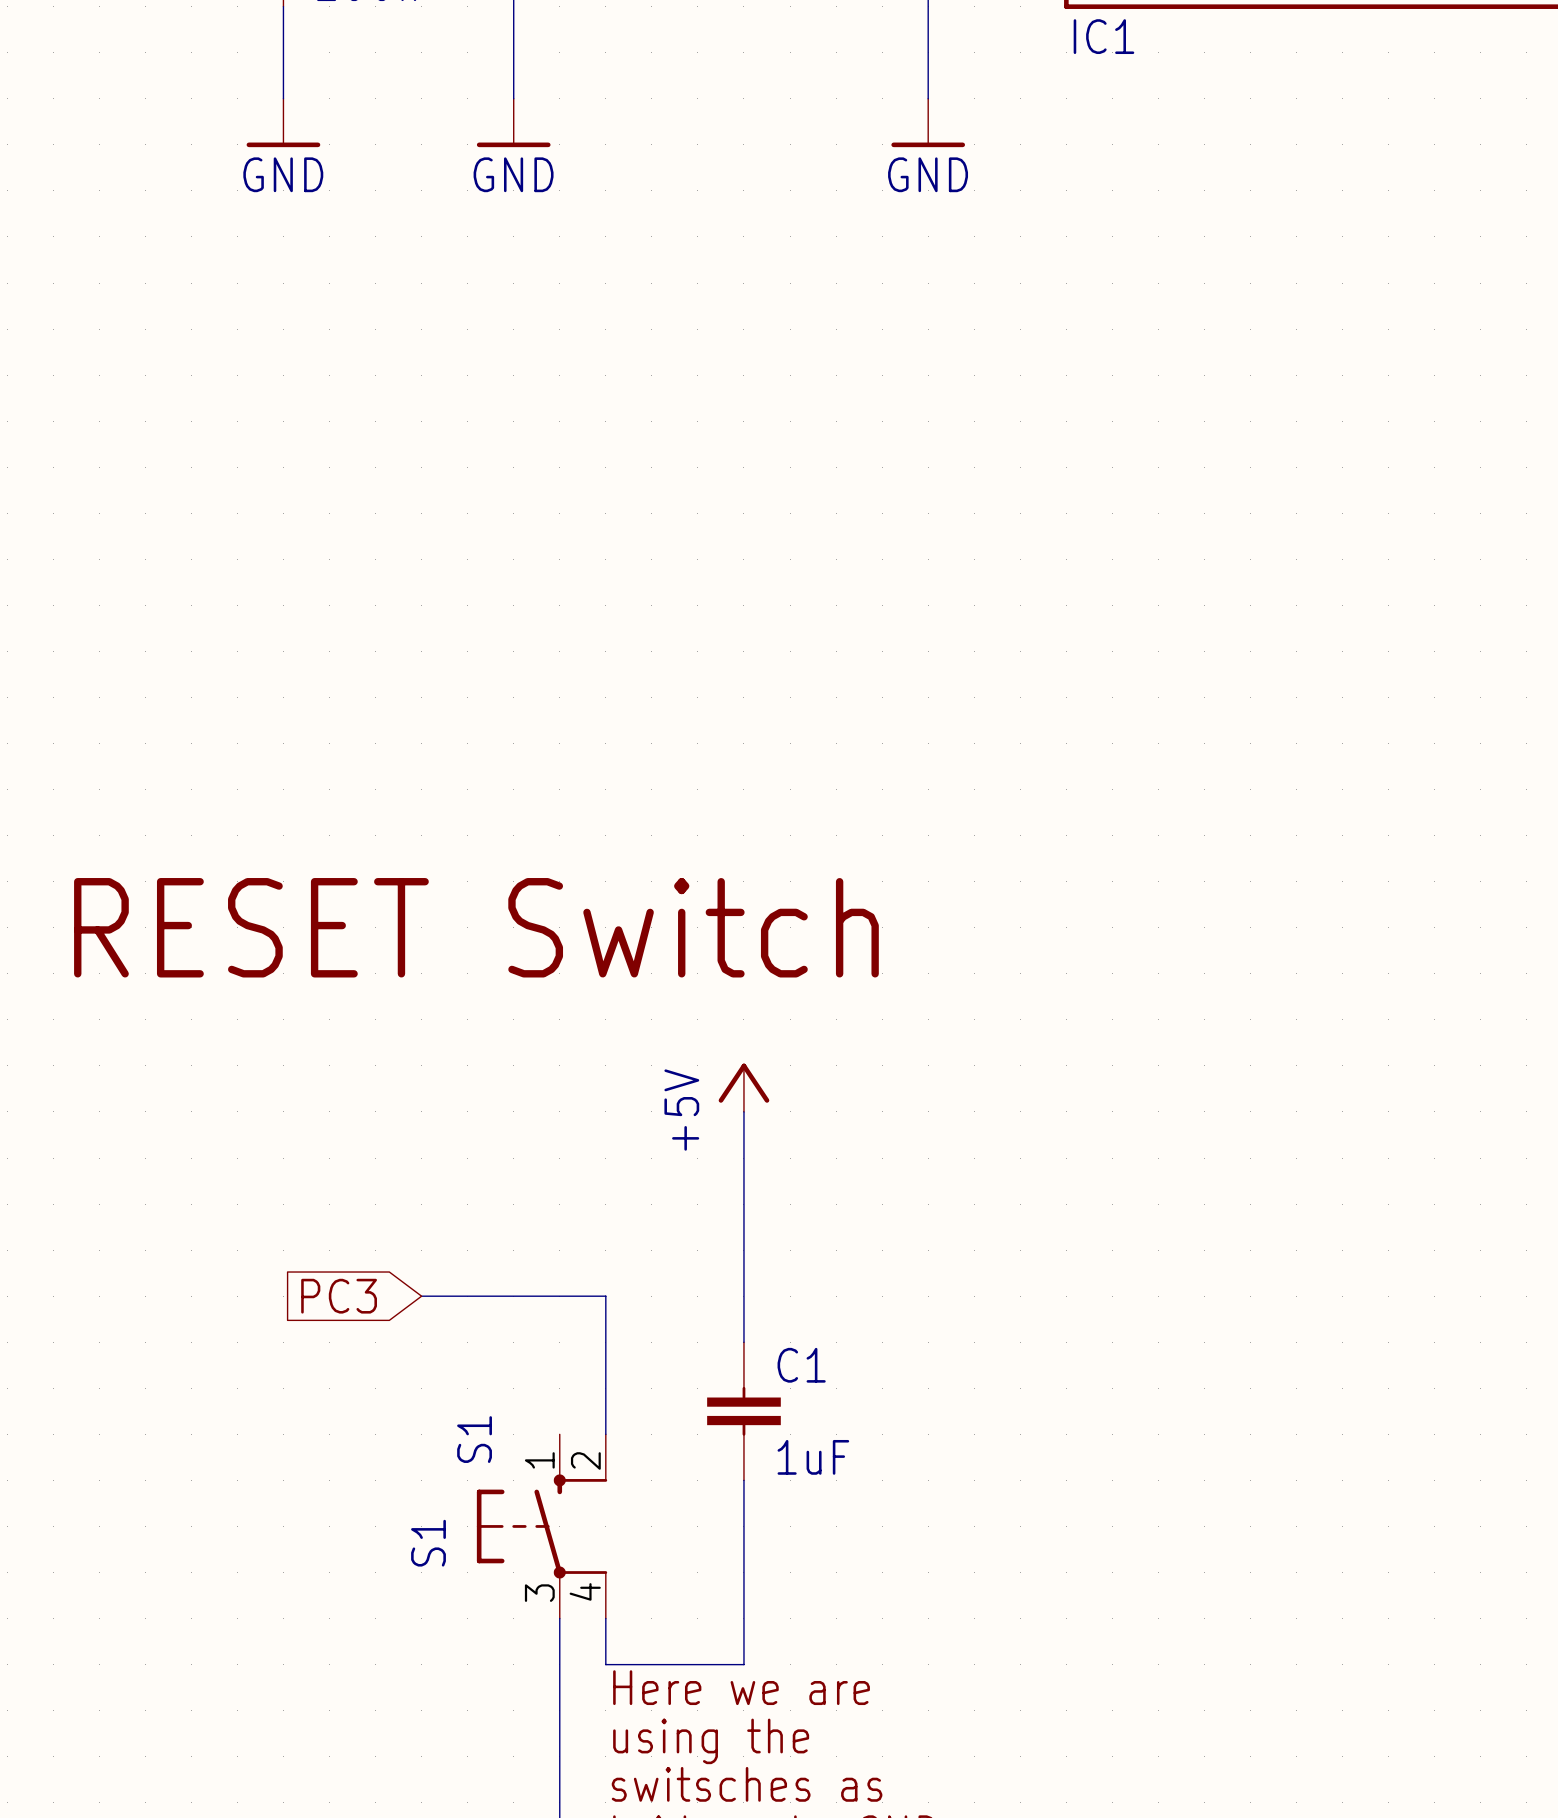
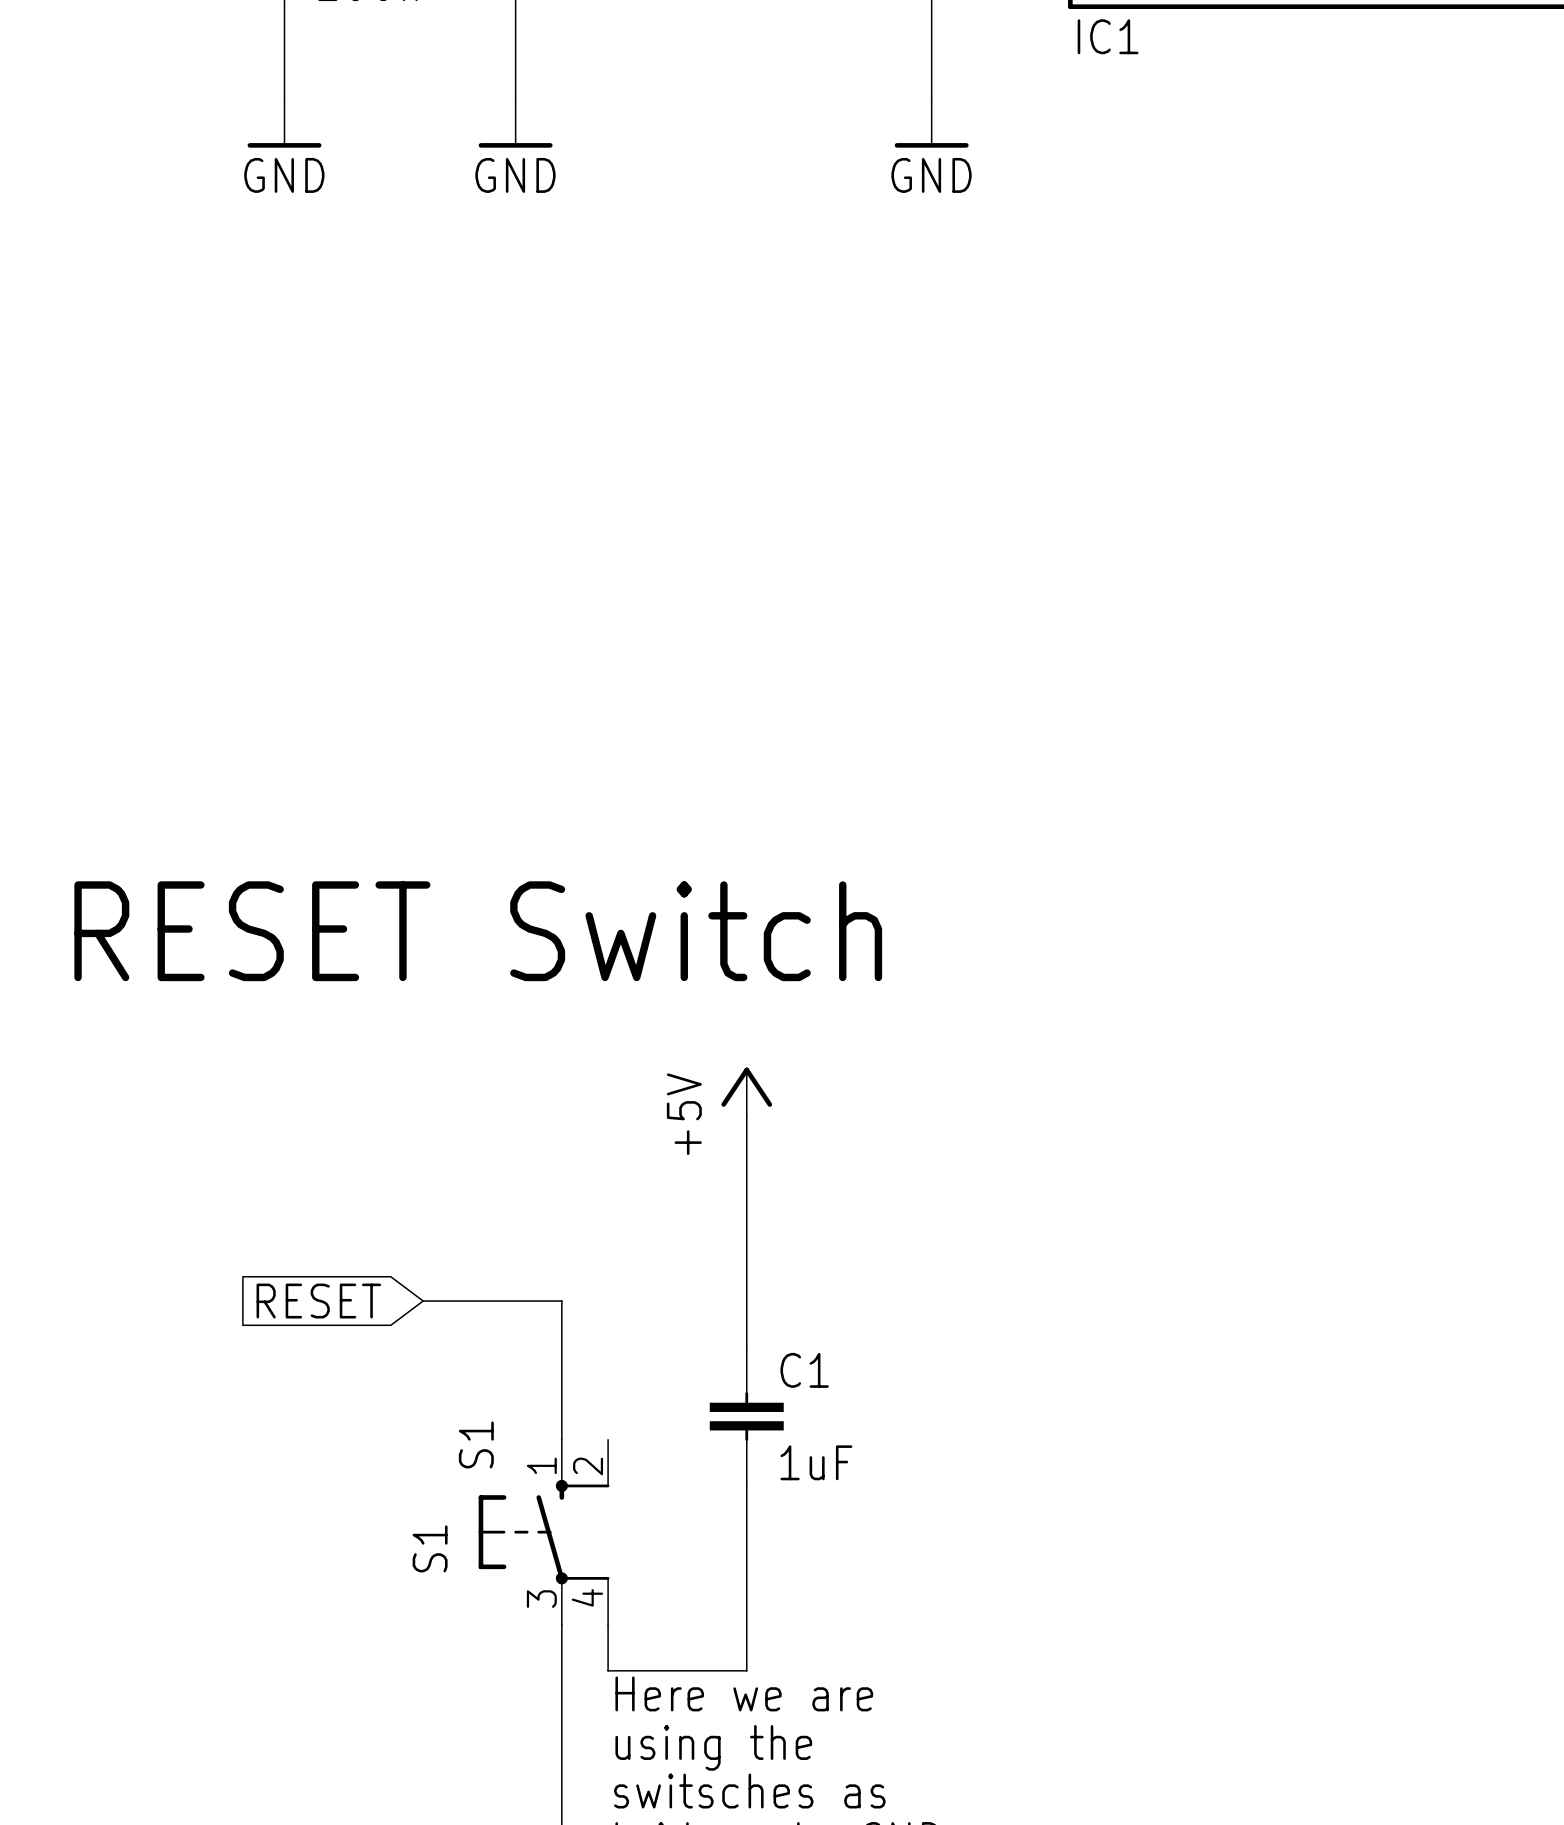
global label: PC3 (339, 1296) -> RESET (318, 1301)
wire: (559, 1296) (605, 1296) (605, 1434) -> (561, 1301) (561, 1439)

